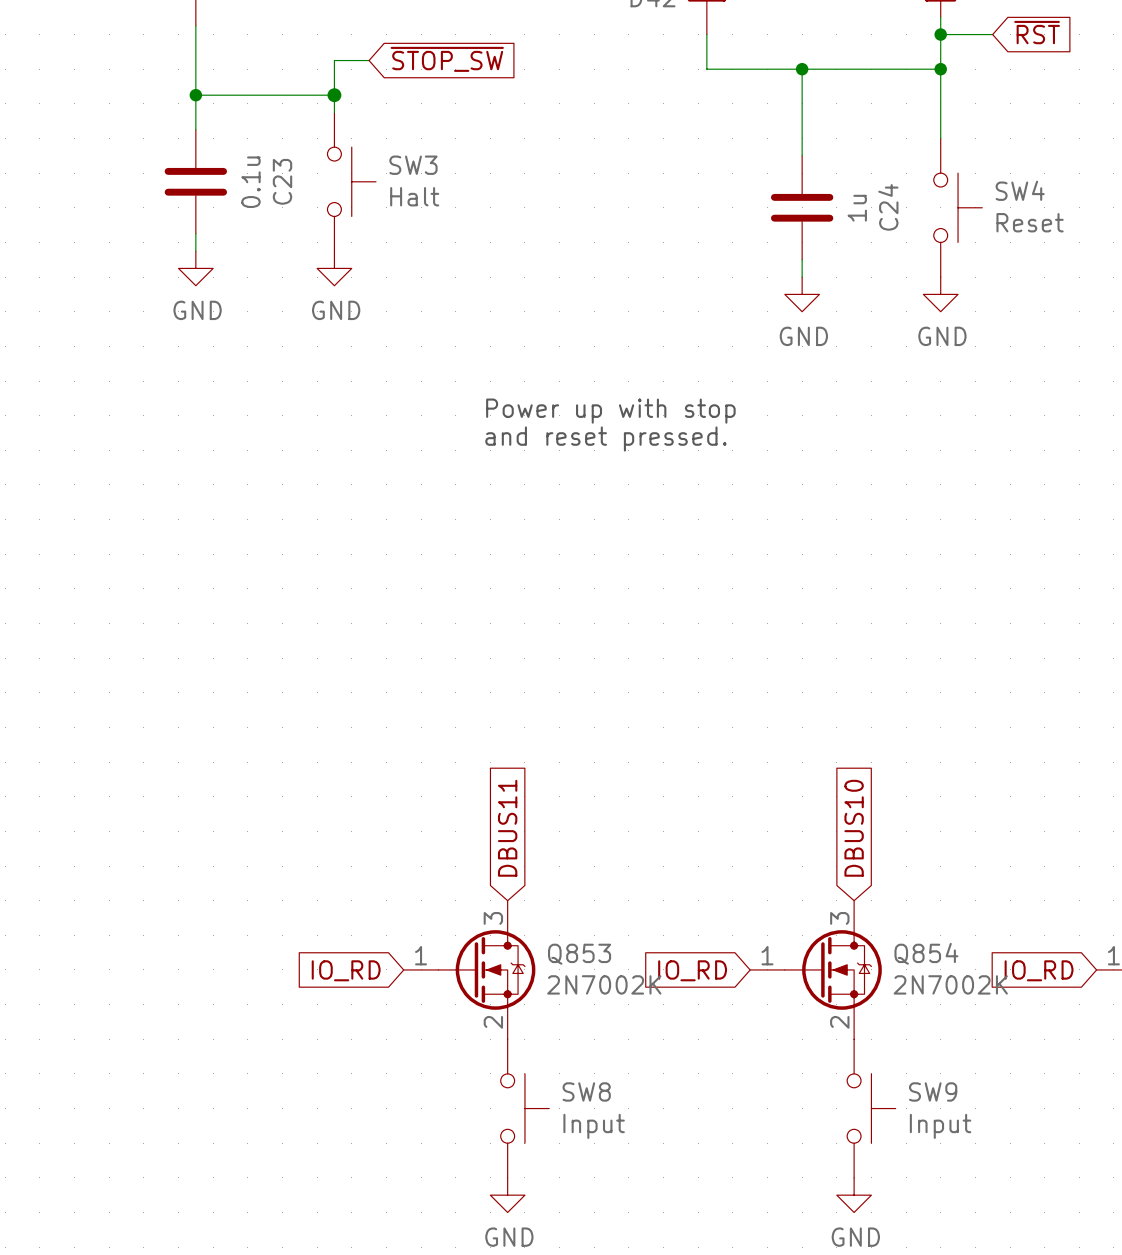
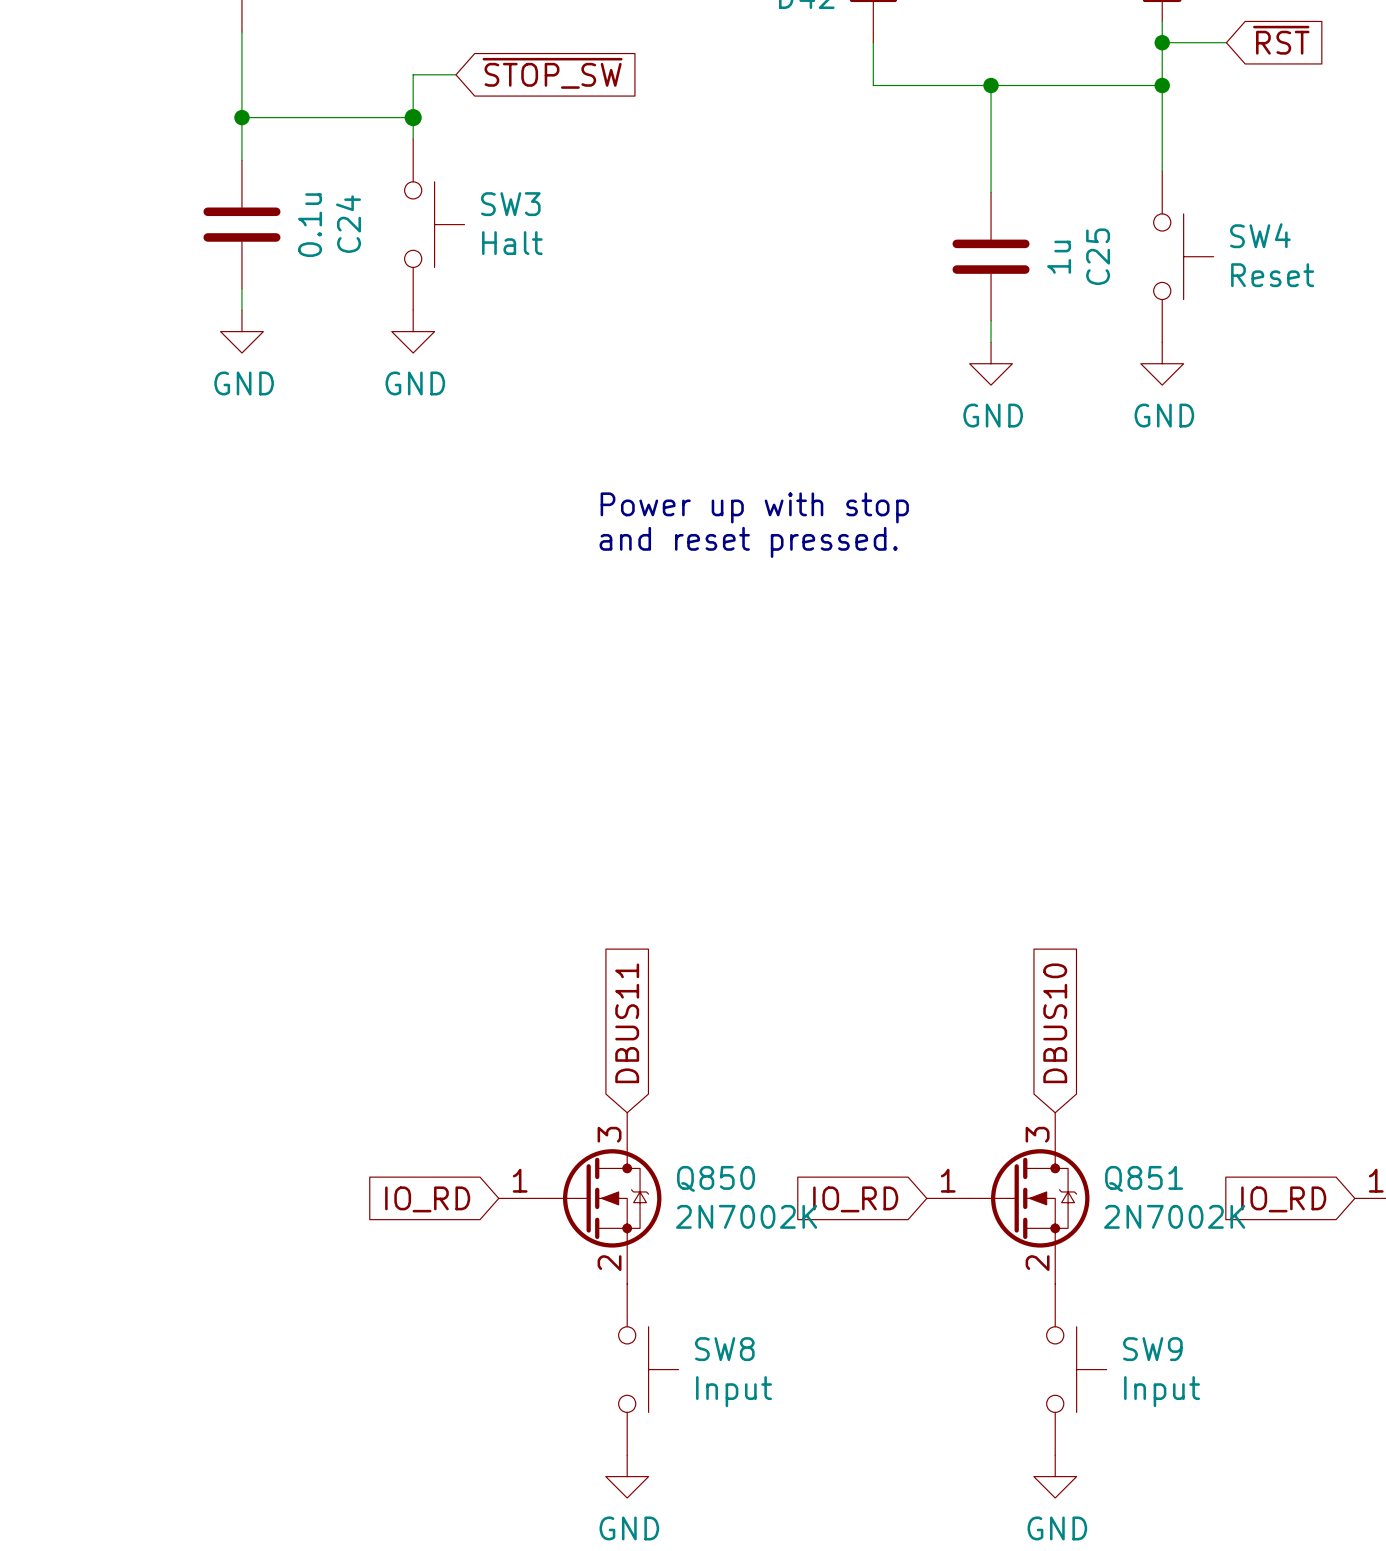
C23 name: C23 (282, 181) -> C24 (348, 224)
C24 name: C24 (888, 207) -> C25 (1098, 256)
Q854 name: Q854 (926, 953) -> Q851 (1144, 1178)
Q853 name: Q853 (579, 954) -> Q850 (716, 1178)

